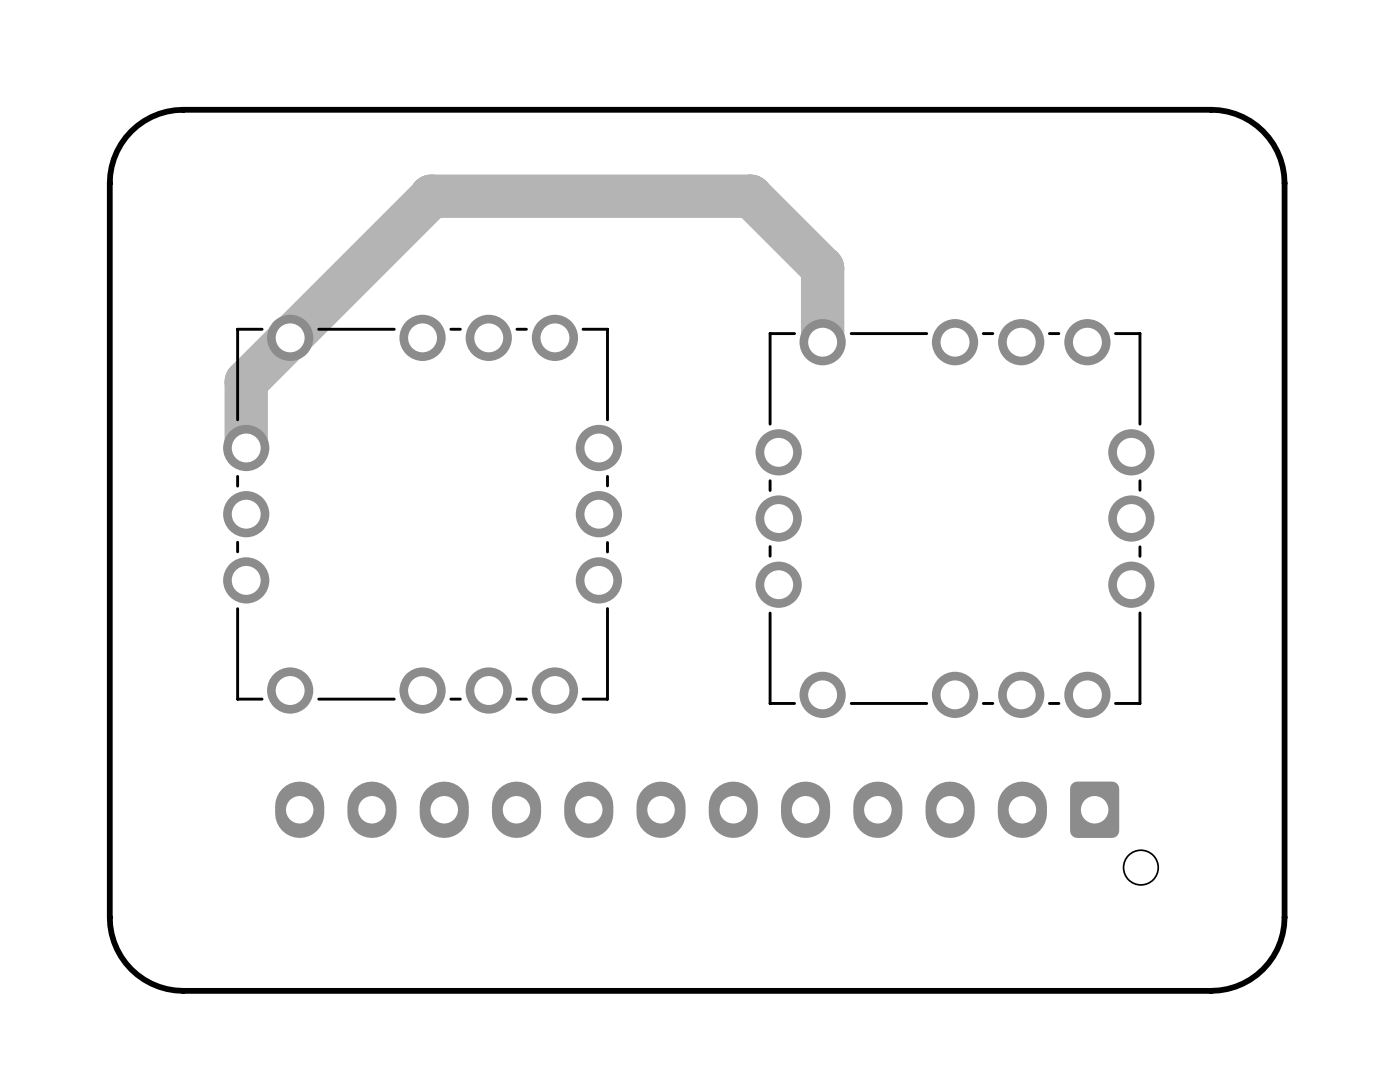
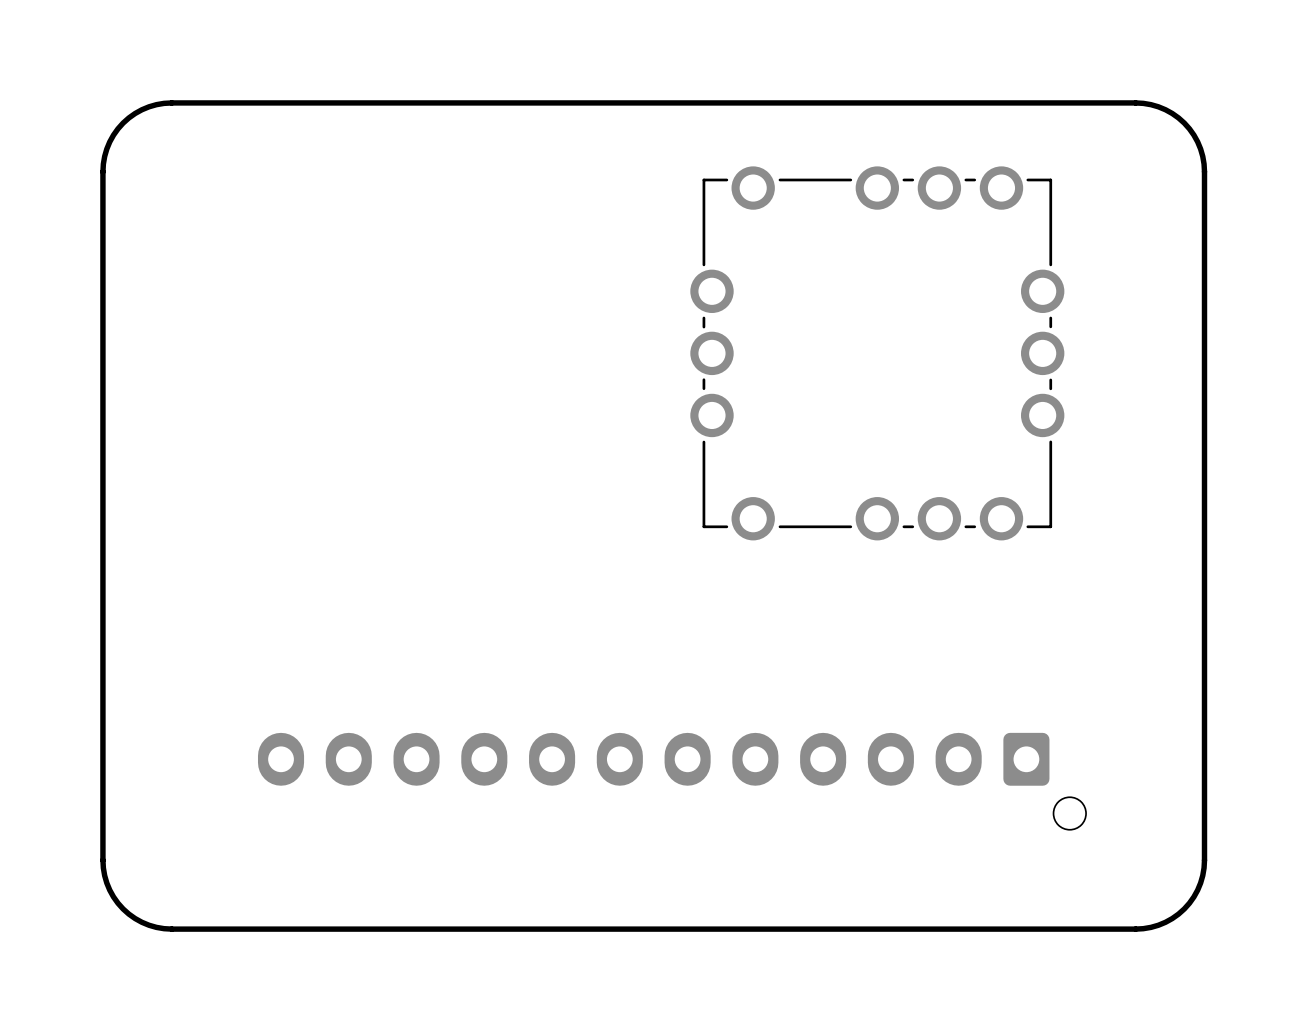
track: (431, 196) (750, 196) (822, 268) (822, 342) -> none
track: (431, 196) (246, 381) (246, 447) -> none
part: (422, 514) -> none
part position: (955, 518) -> (877, 353)

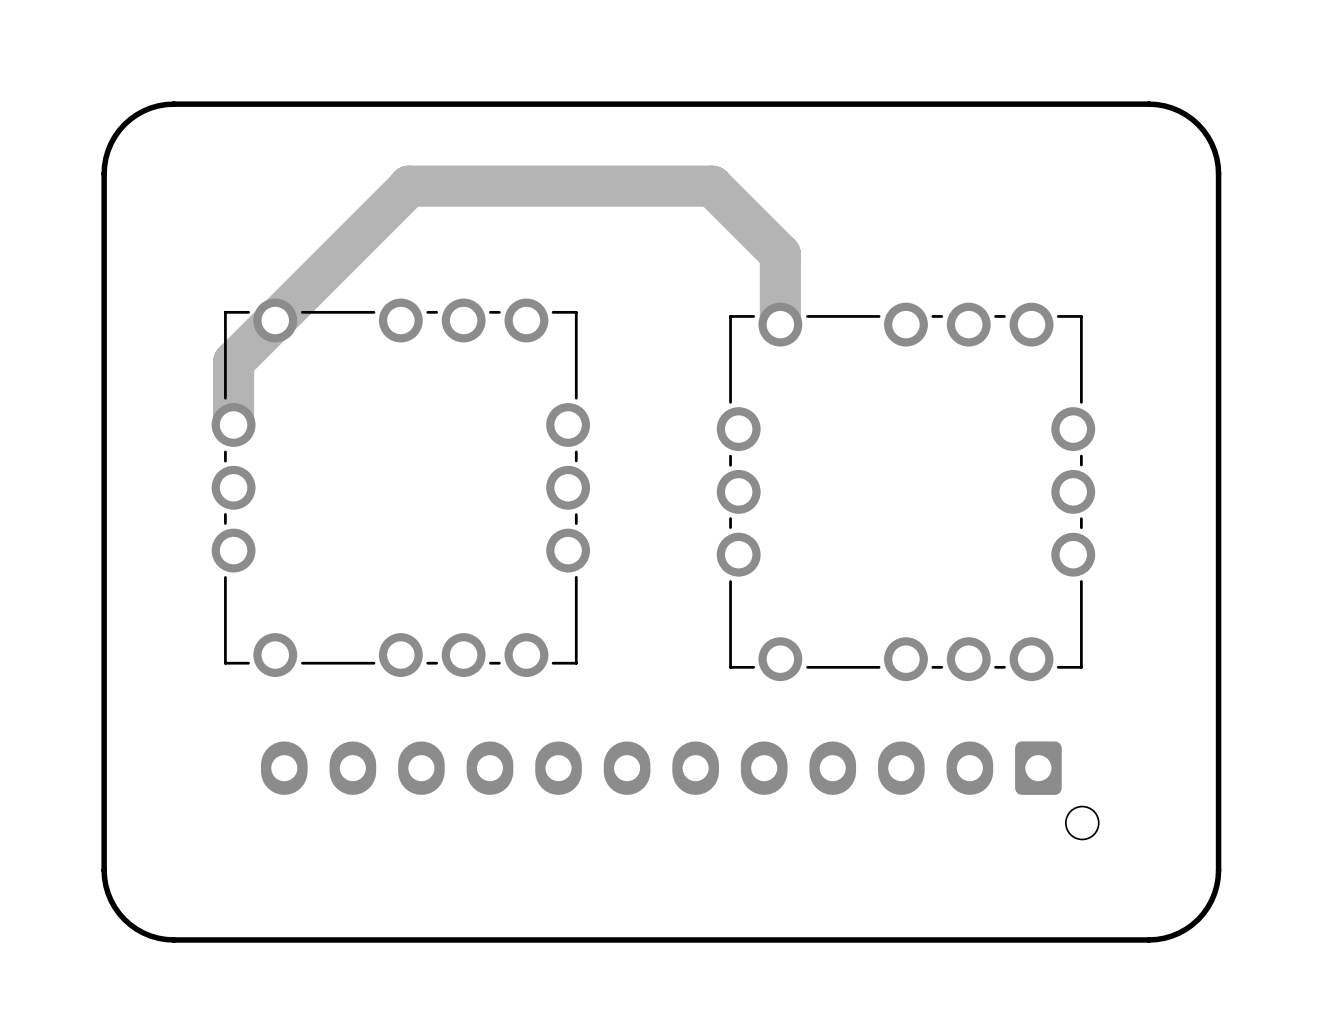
track: none -> (409, 186) (712, 186) (780, 254) (780, 324)
track: none -> (409, 186) (233, 362) (233, 424)
part position: (877, 353) -> (905, 491)
part: none -> (400, 487)

